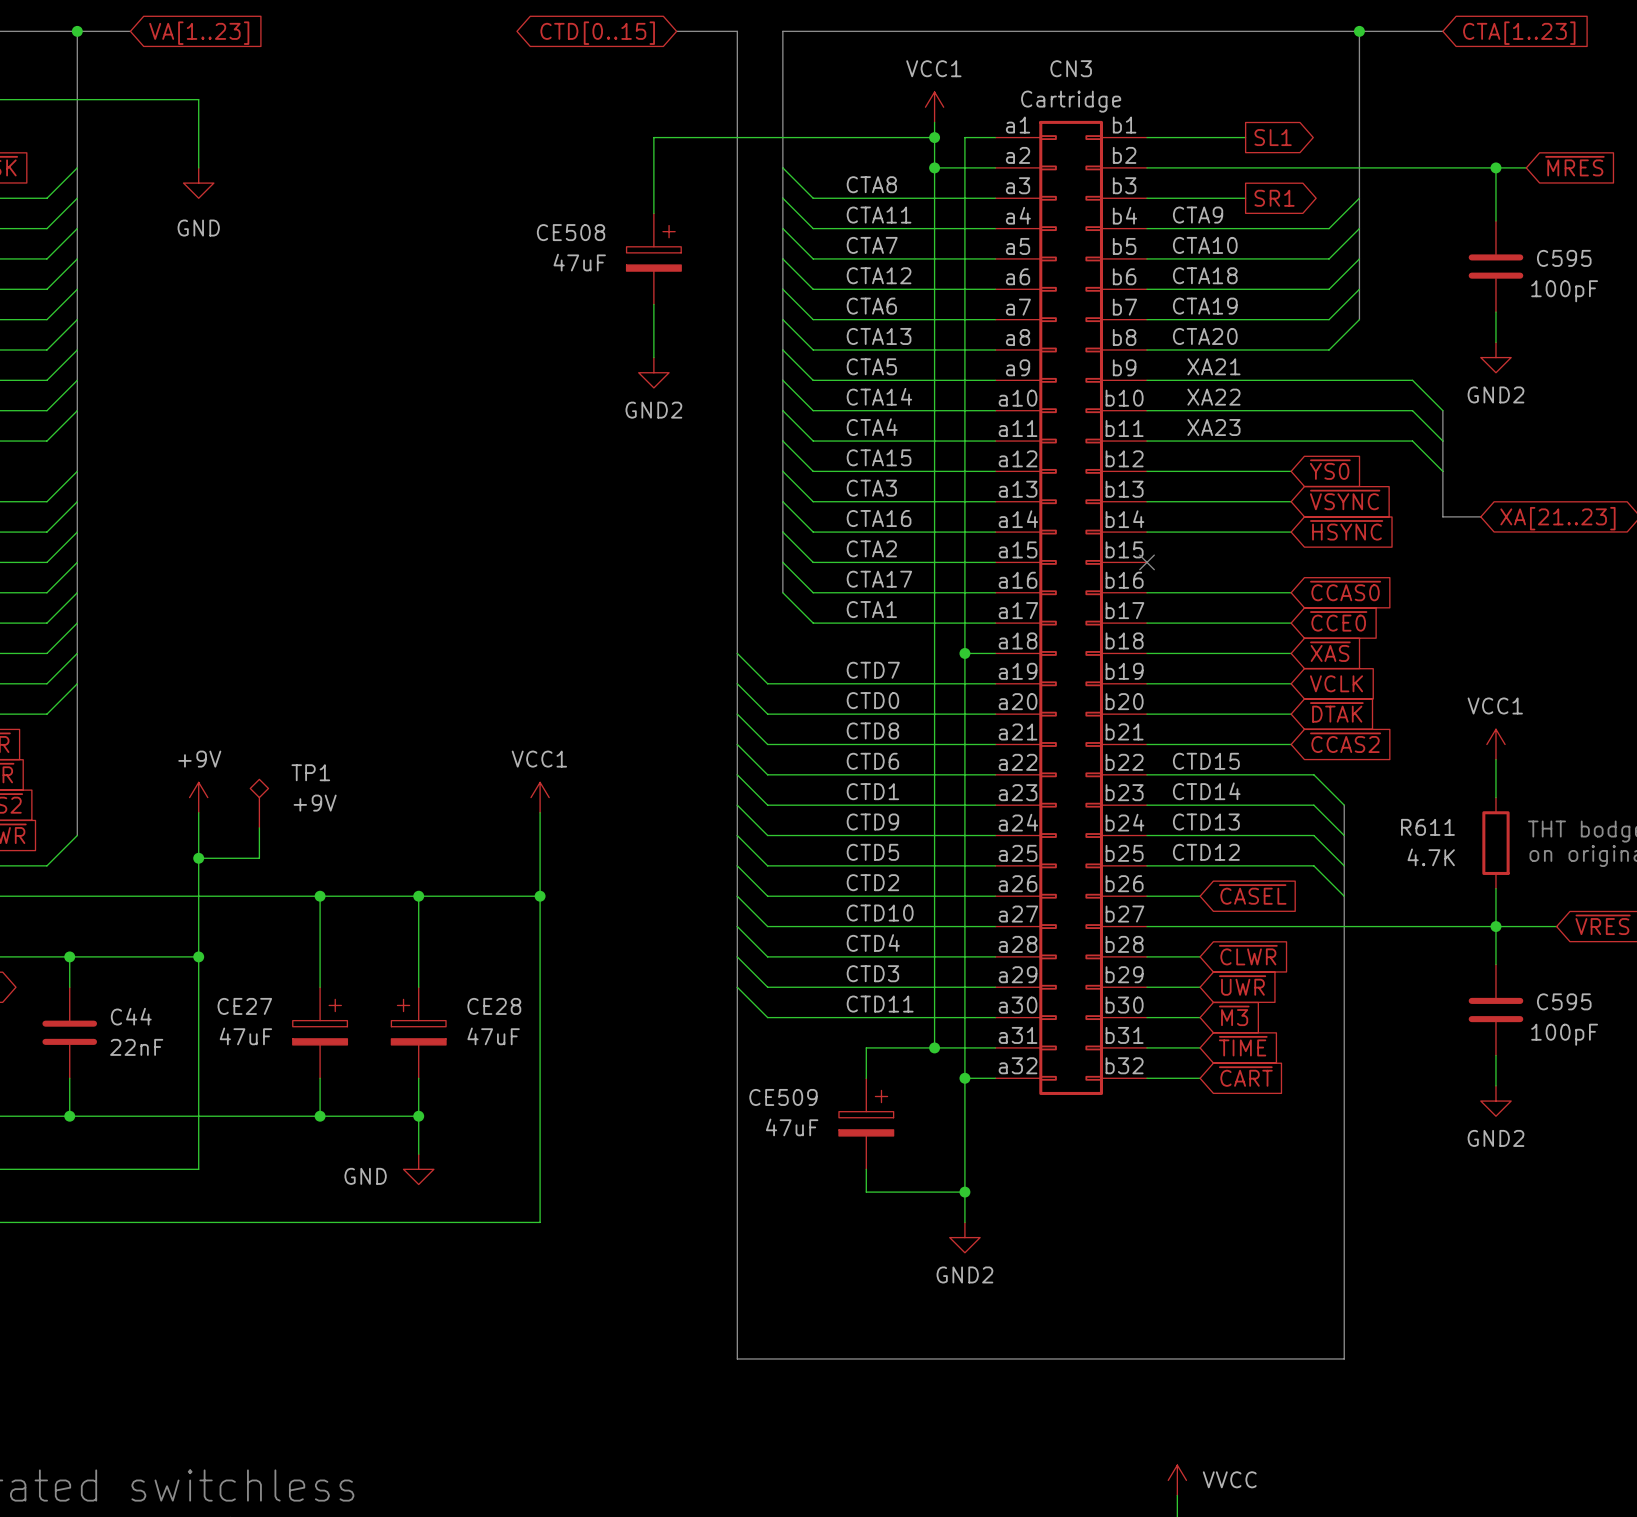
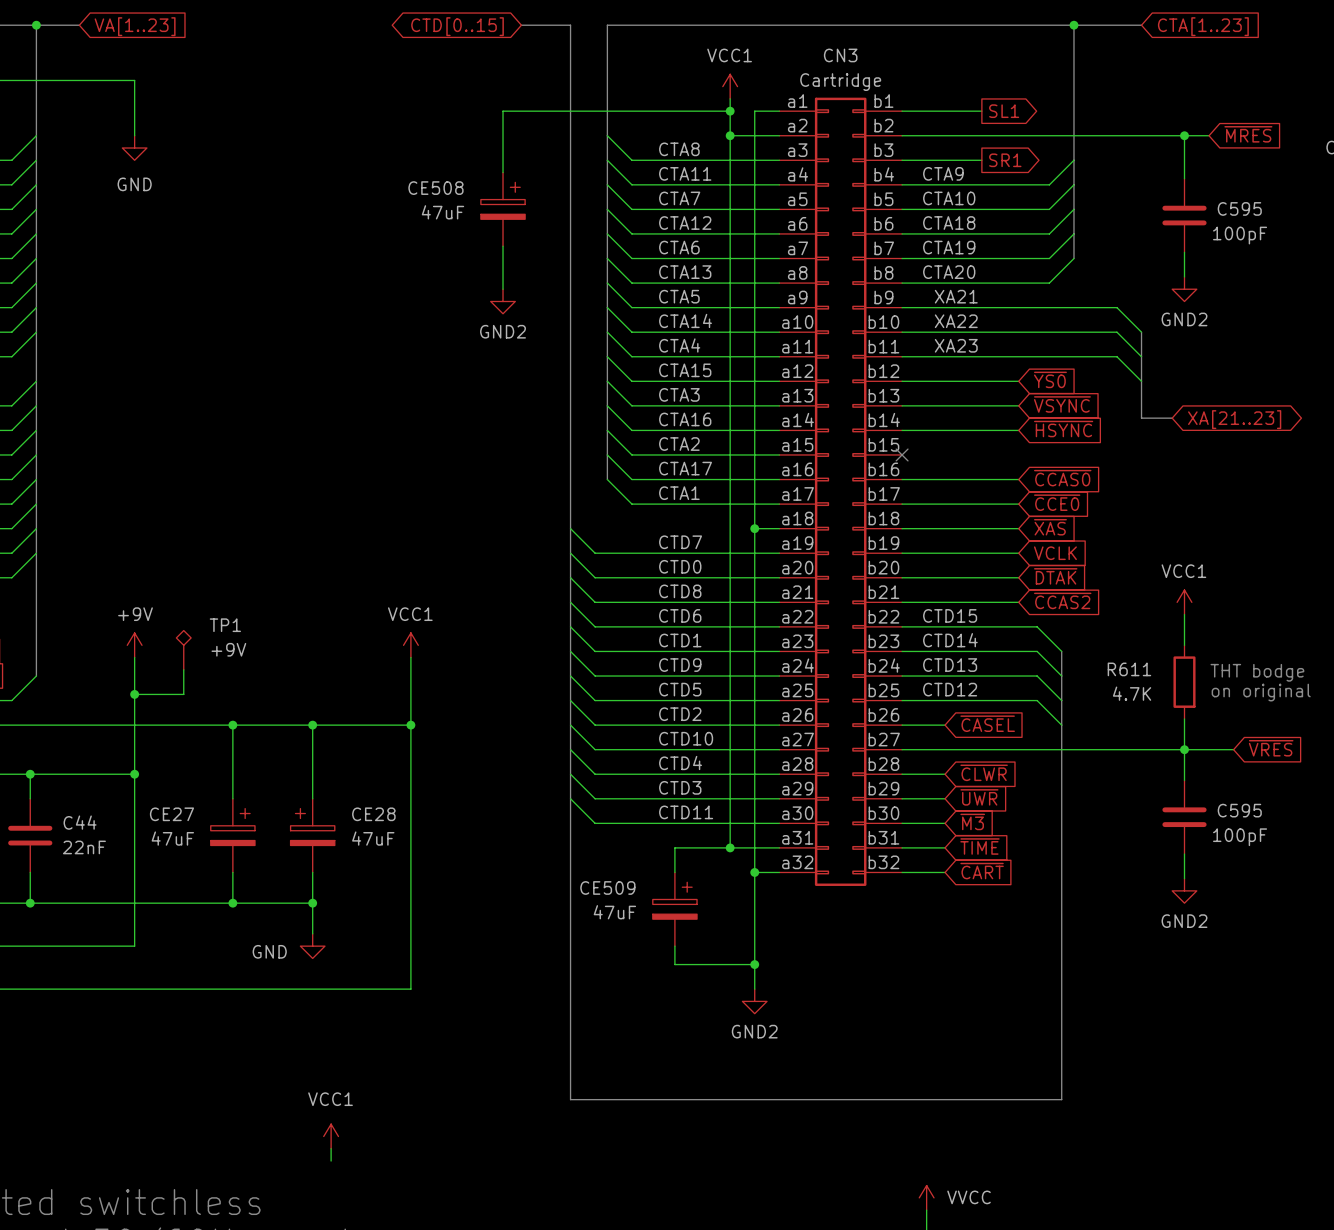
power symbol: none -> VCC1 (331, 1136)
wire: none -> (331, 1148) (331, 1161)

